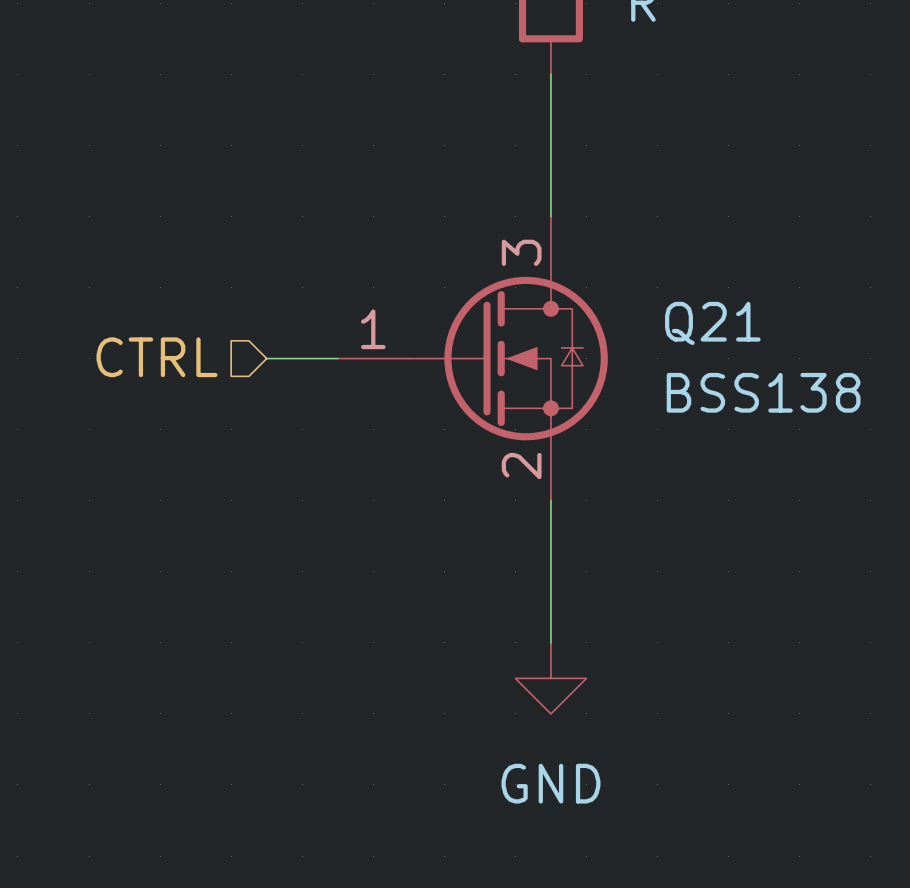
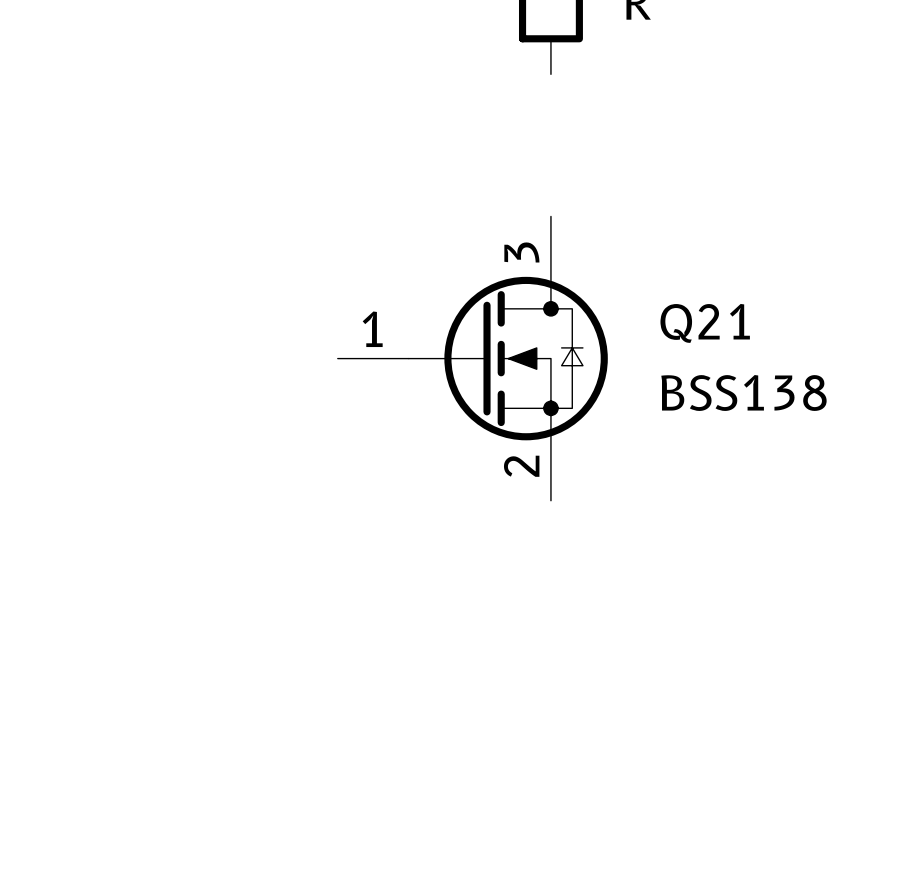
wire: (550, 74) (550, 216) -> none
hierarchical label: CTRL (157, 357) -> none
wire: (266, 358) (337, 358) -> none
wire: (550, 500) (550, 642) -> none
power symbol: GND (550, 678) -> none

